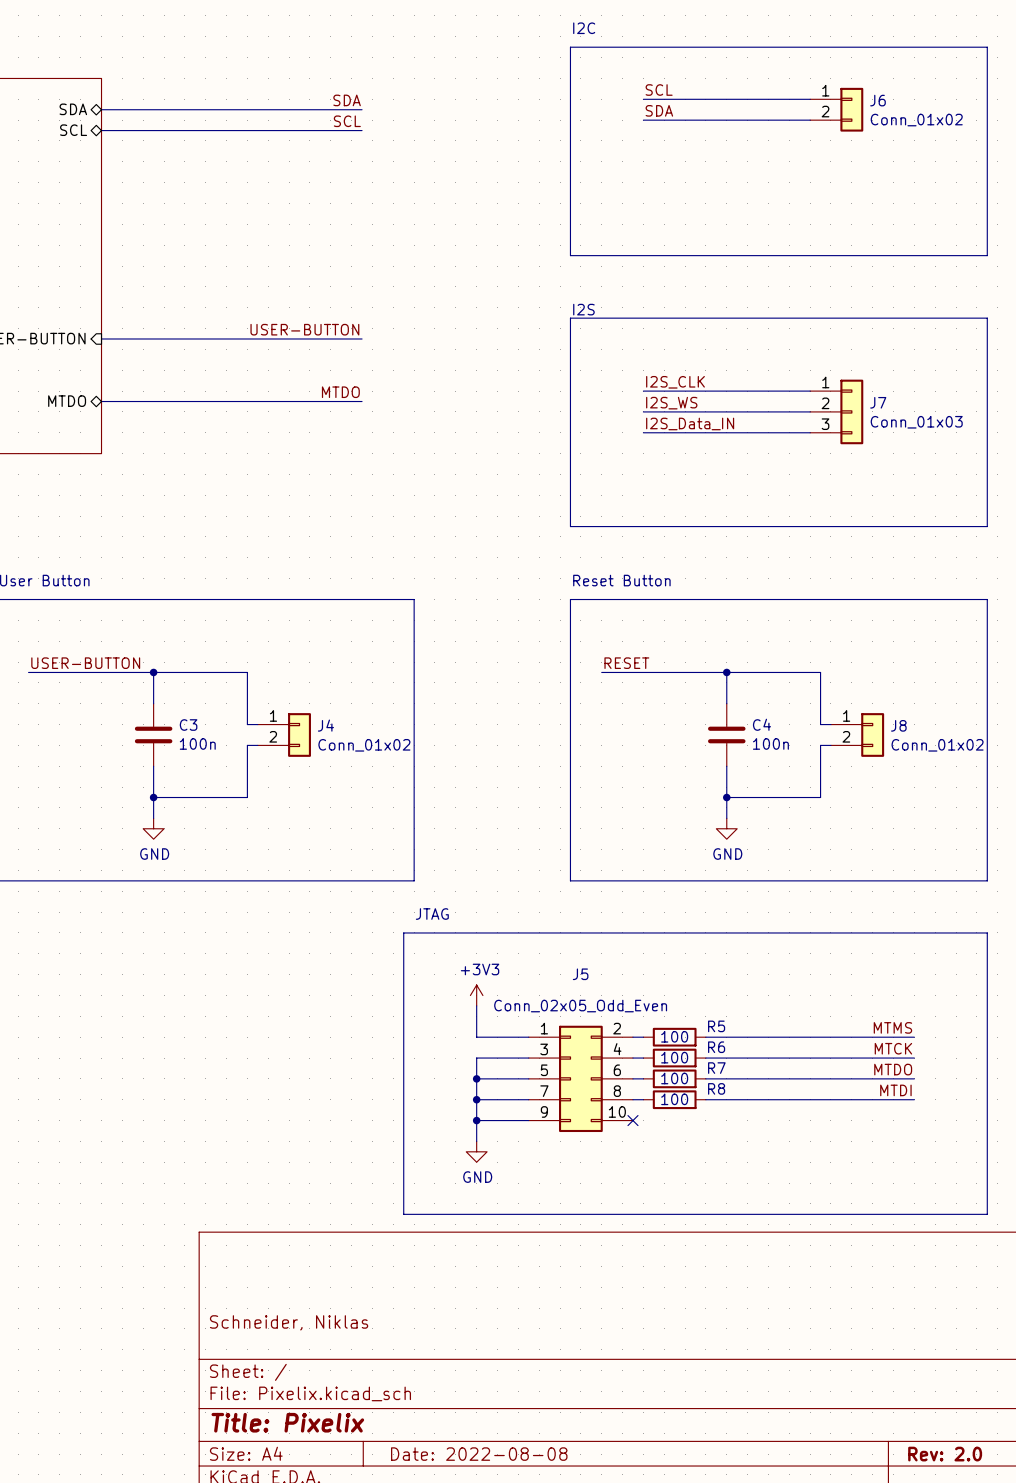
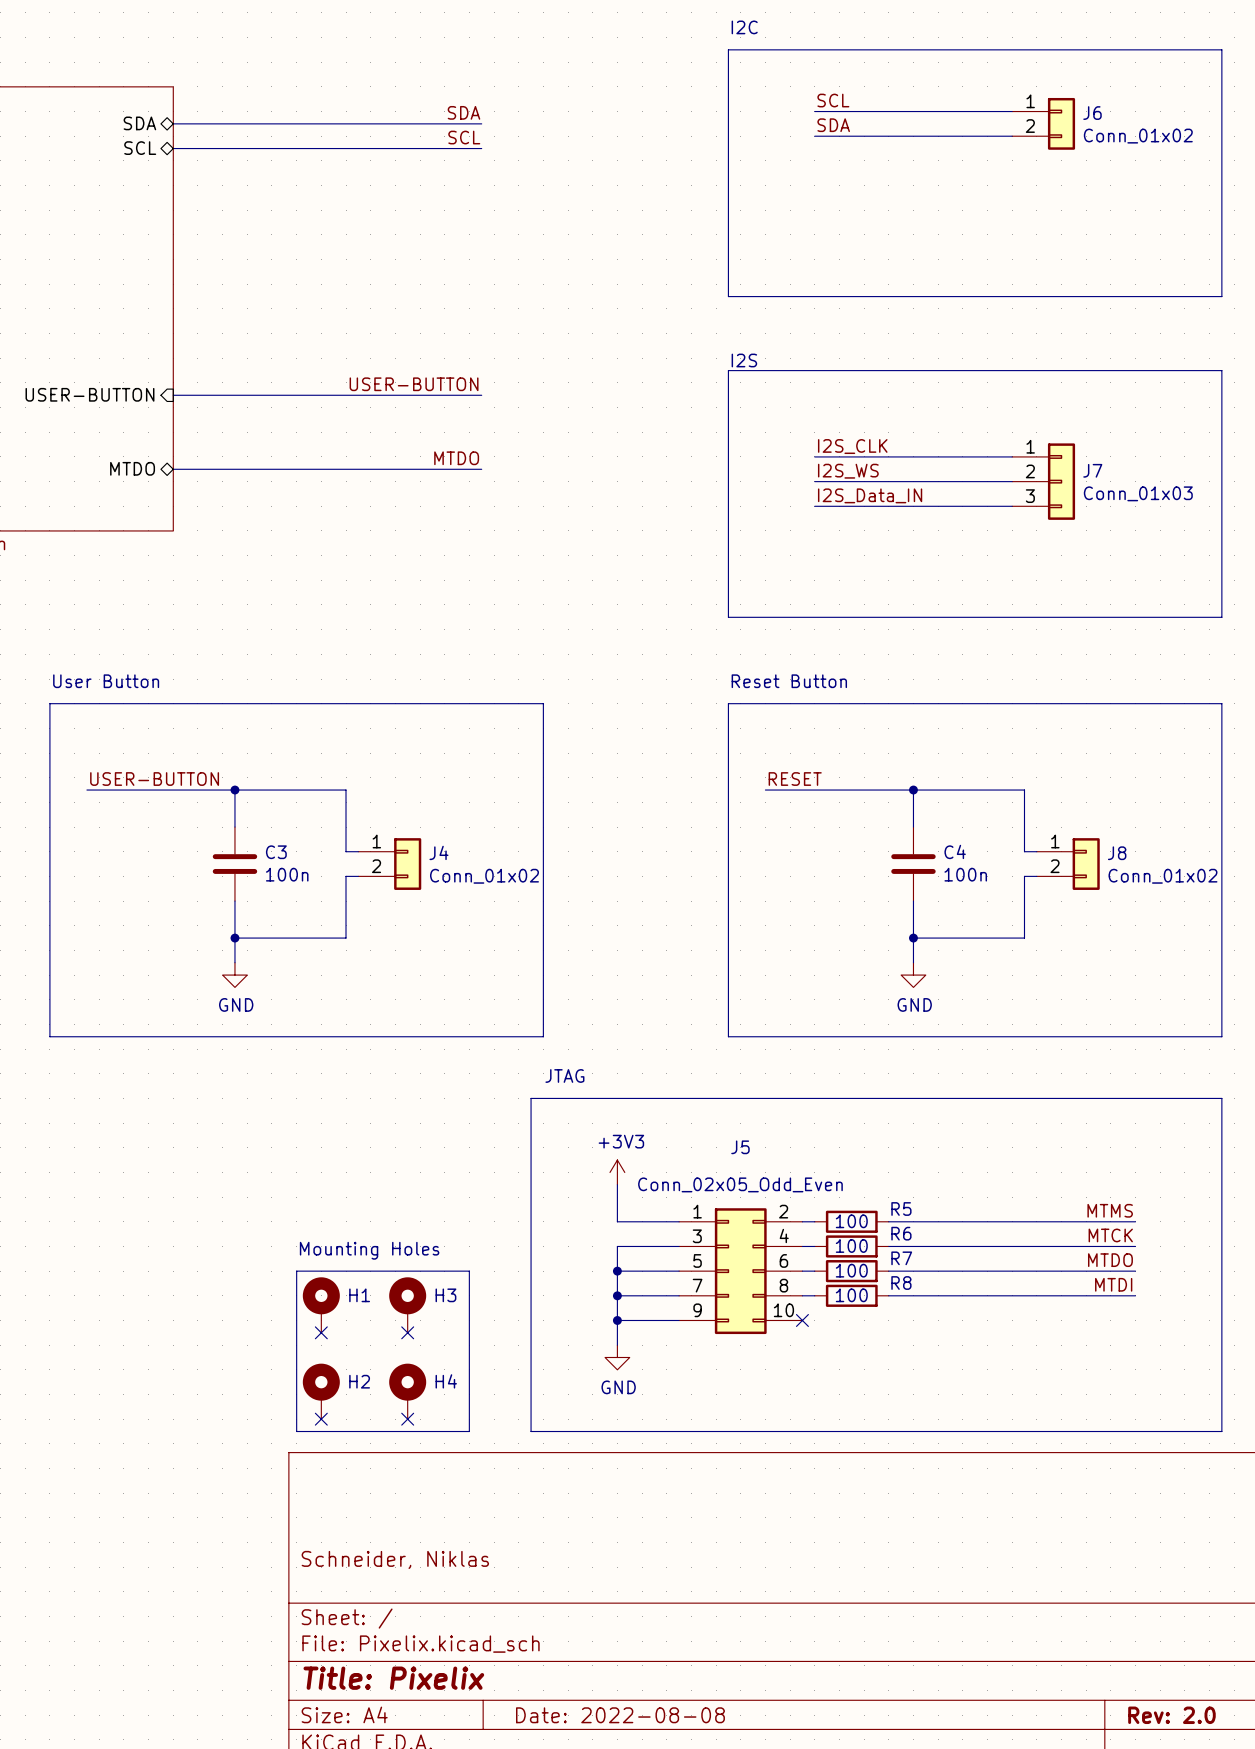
text: none -> Mounting Holes (369, 1250)
line: none -> (296, 1271) (296, 1431) (469, 1431) (469, 1271) (296, 1271)
H1: none -> (321, 1305)
H3: none -> (407, 1305)
no-connect mark: none -> (321, 1332)
no-connect mark: none -> (407, 1332)
H2: none -> (321, 1391)
H4: none -> (407, 1391)
no-connect mark: none -> (321, 1419)
no-connect mark: none -> (407, 1419)

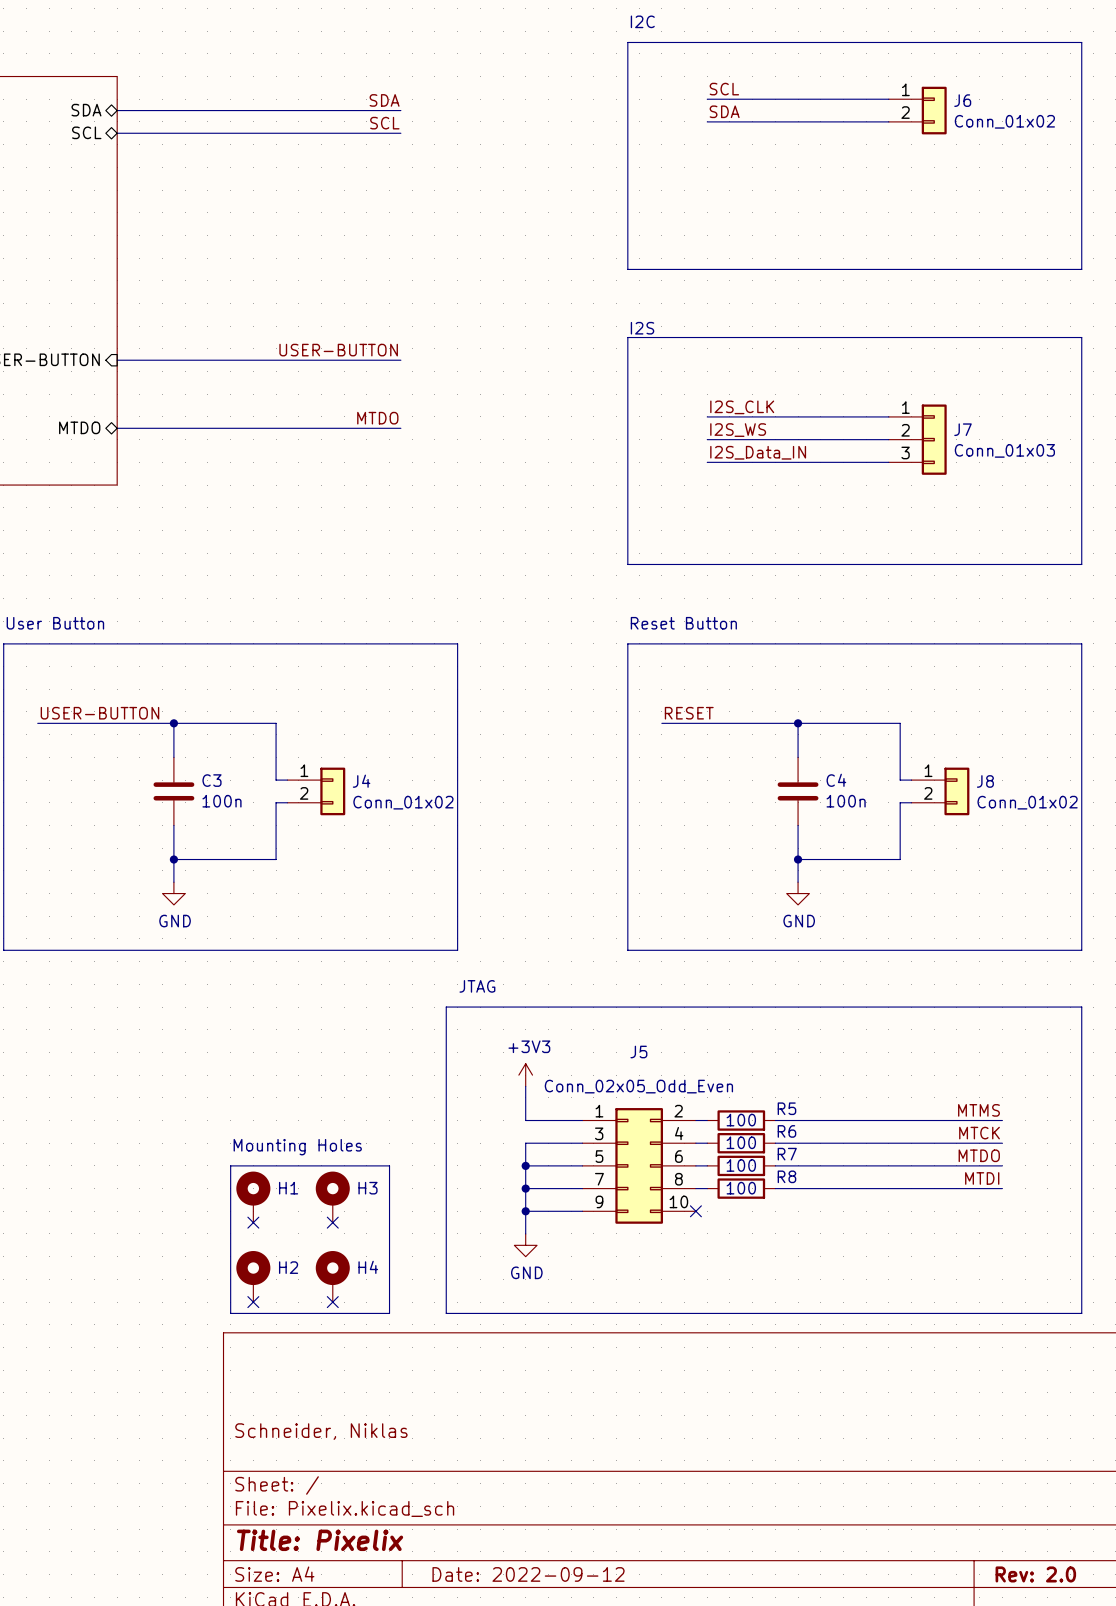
title block: Date: 2022-08-08 (620, 1715) -> Date: 2022-09-12 (528, 1574)

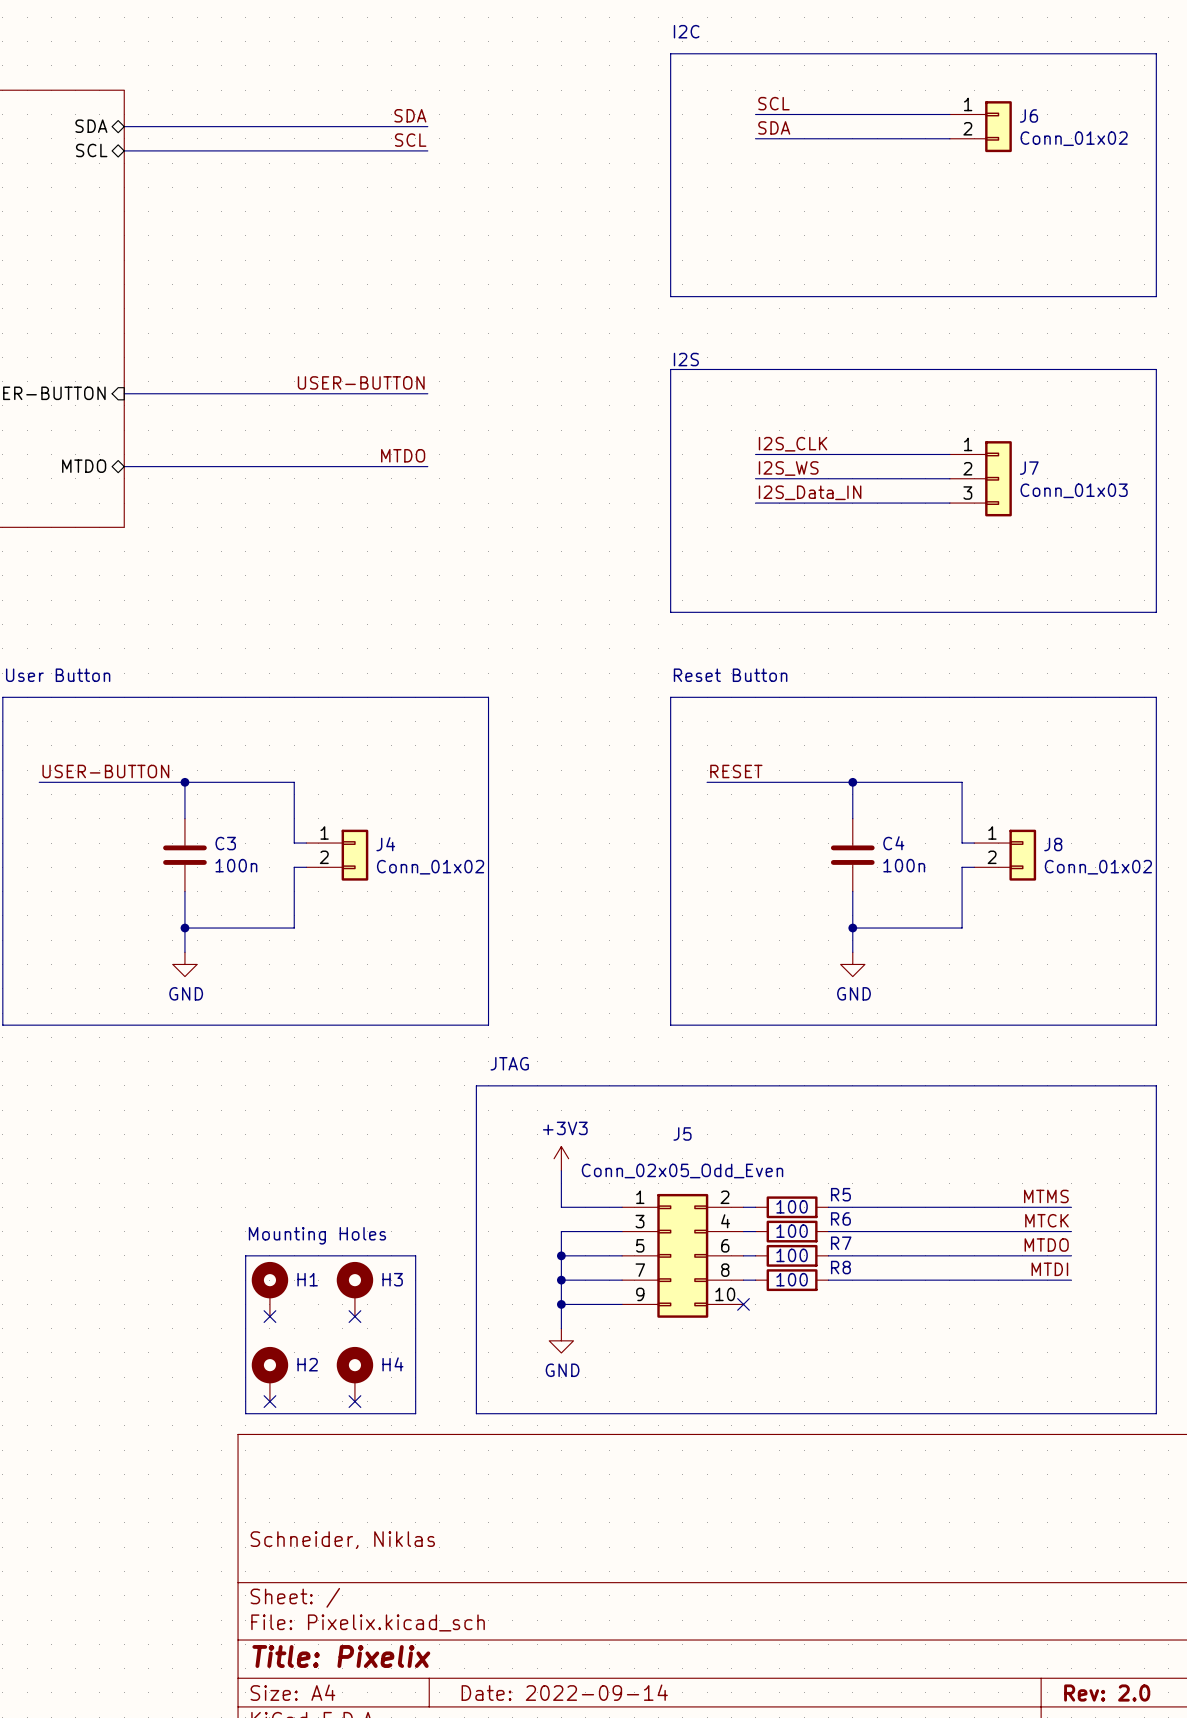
title block: Date: 2022-09-12 (528, 1574) -> Date: 2022-09-14 (564, 1692)

